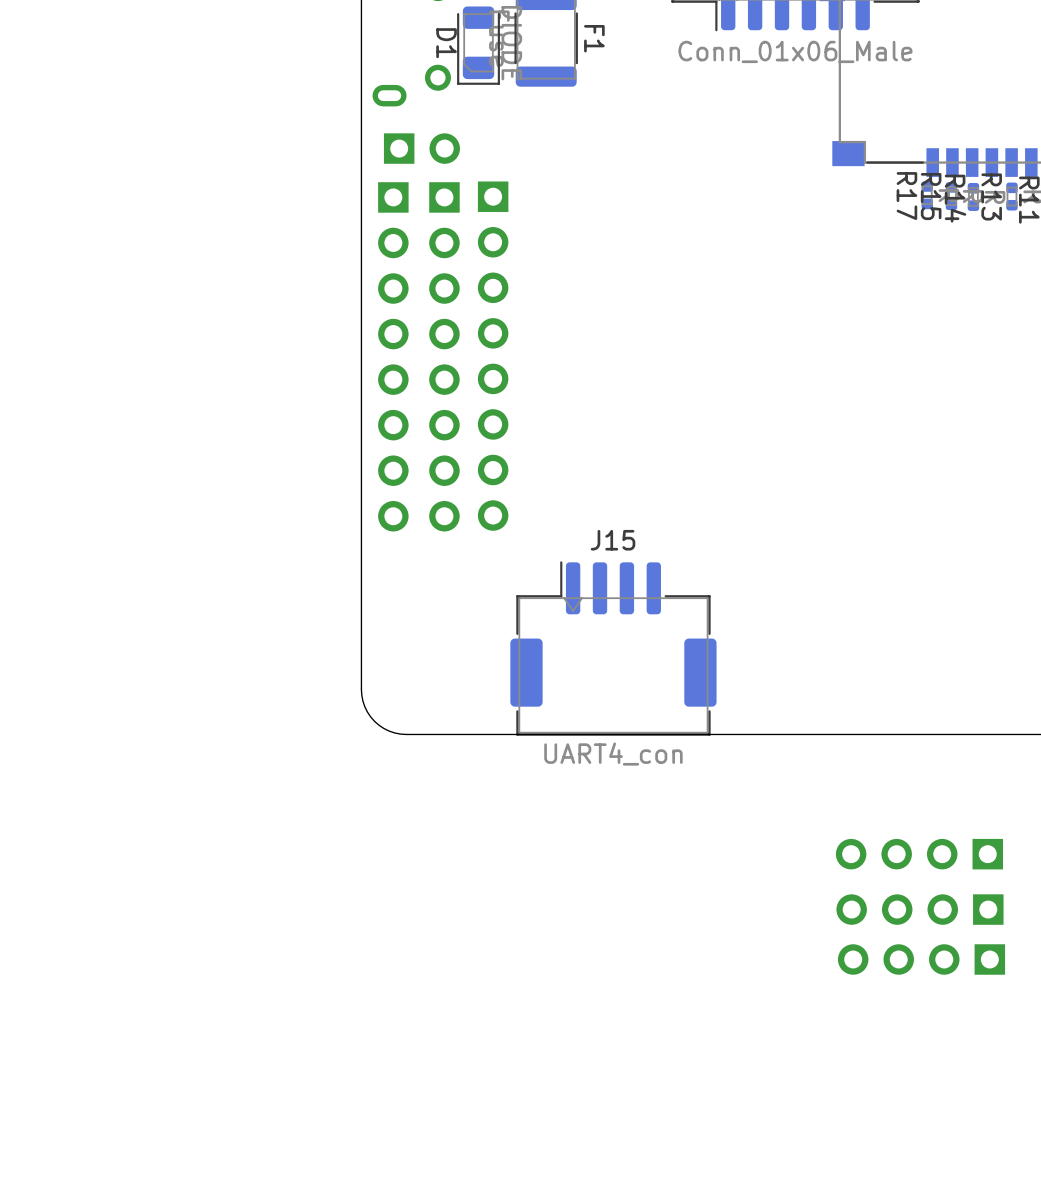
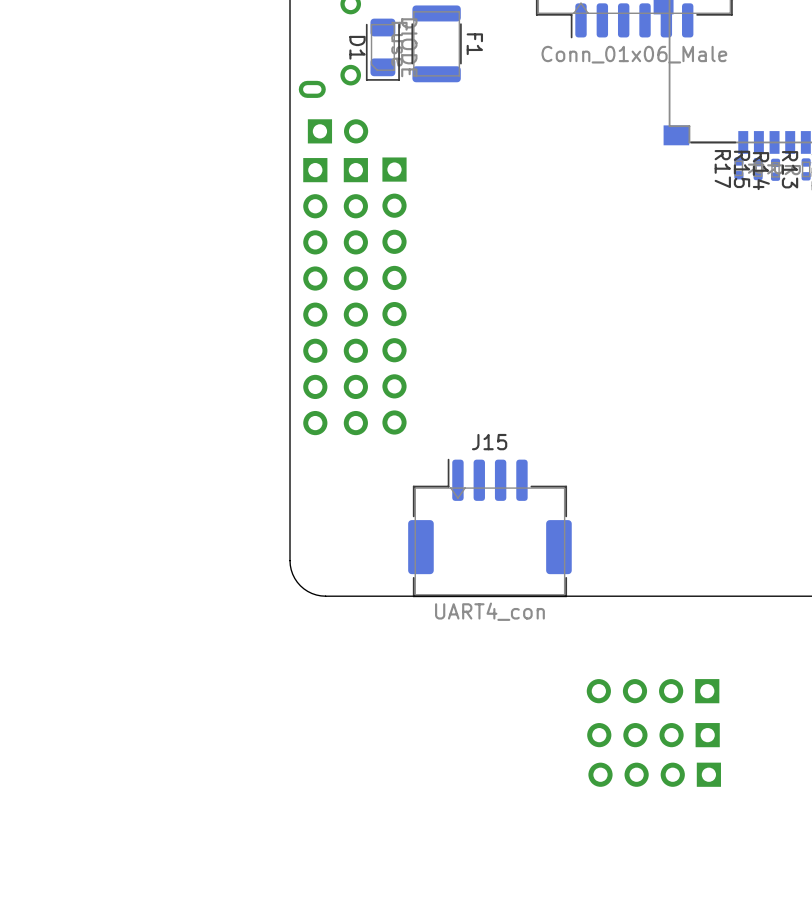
part: none -> (653, 691)
part: (919, 854) -> none
part: none -> (653, 735)
part: (919, 909) -> none
part: none -> (654, 774)
part: (921, 959) -> none

